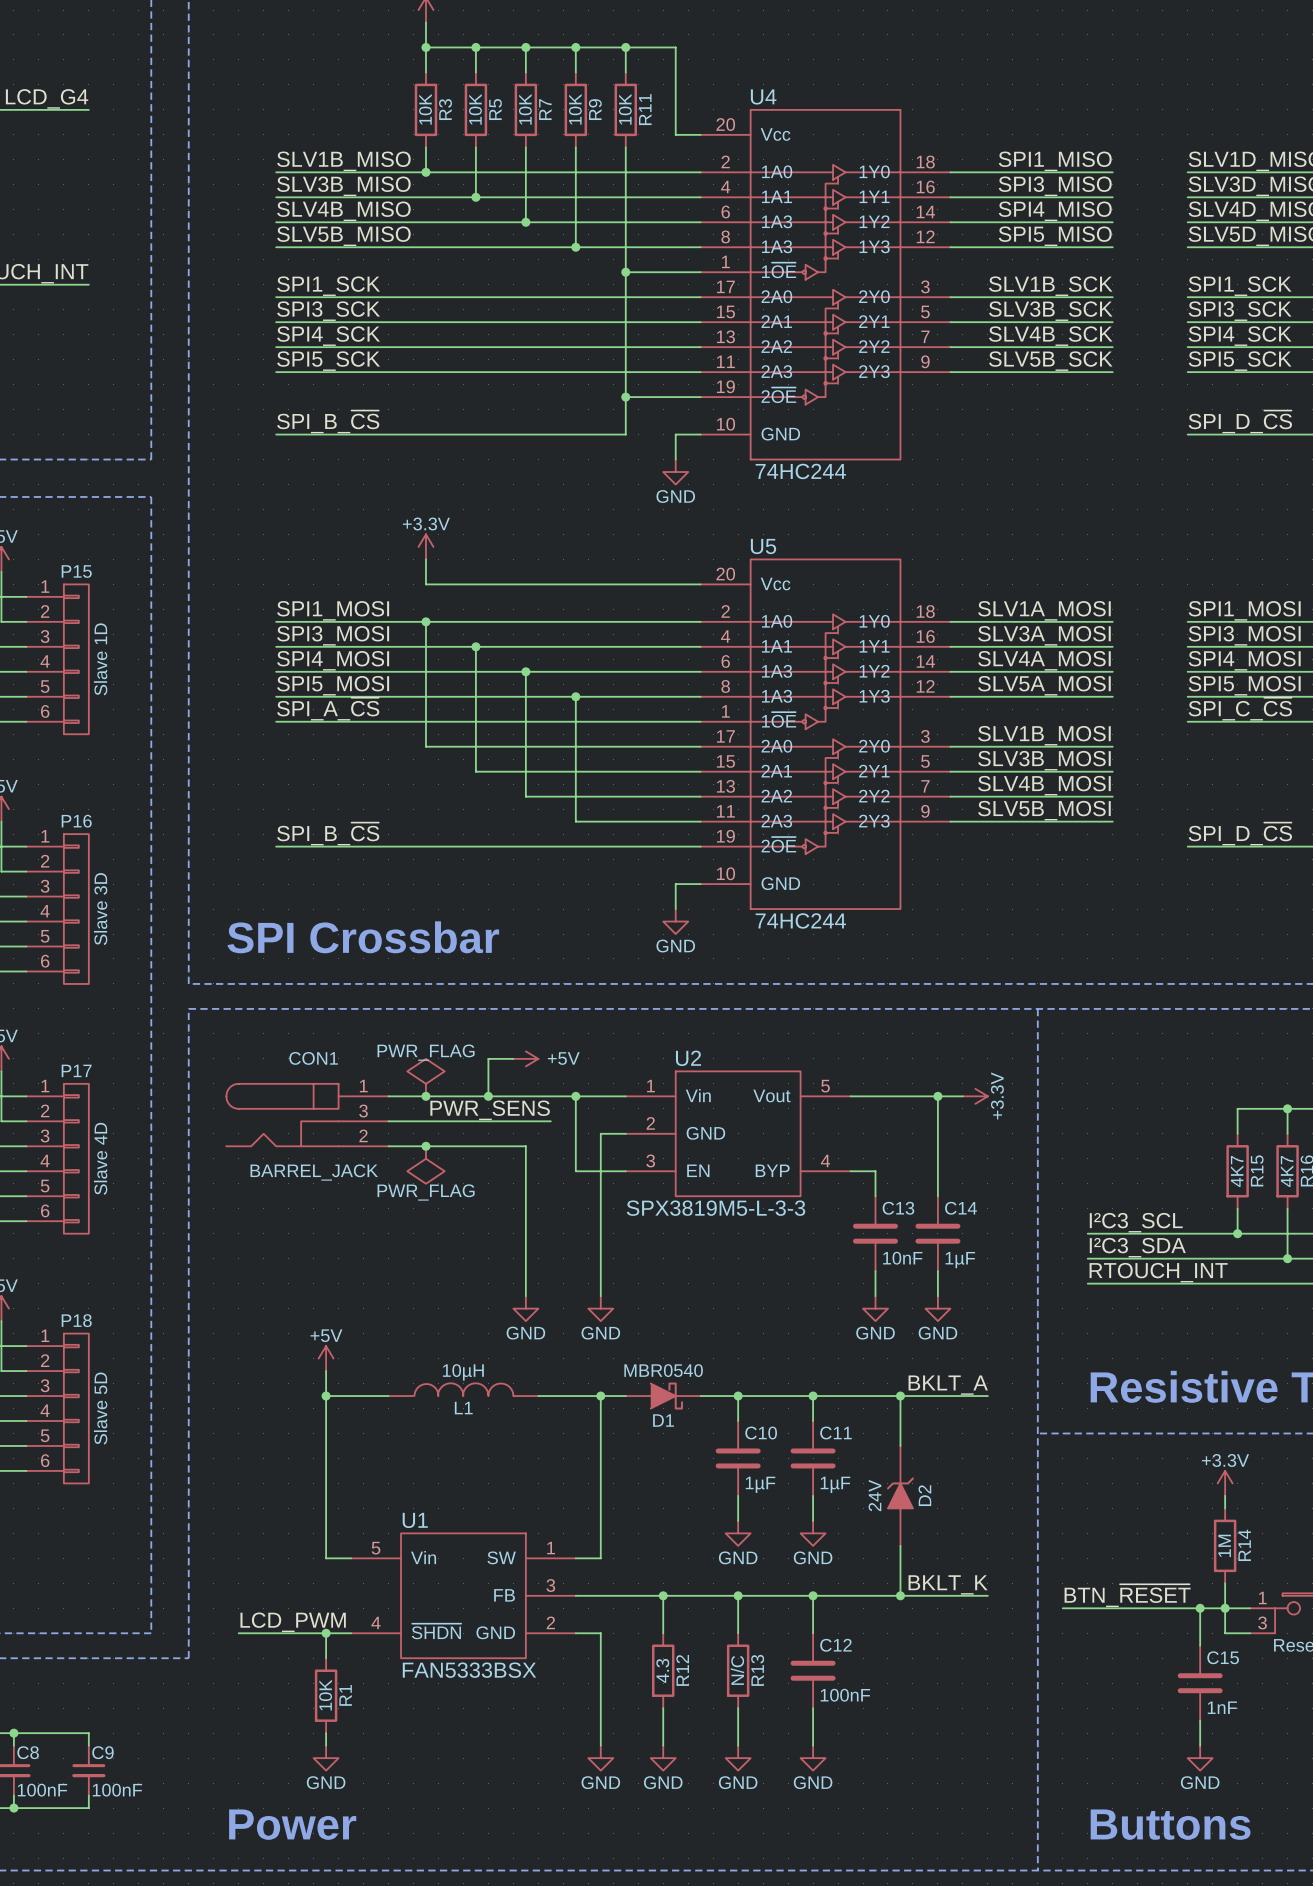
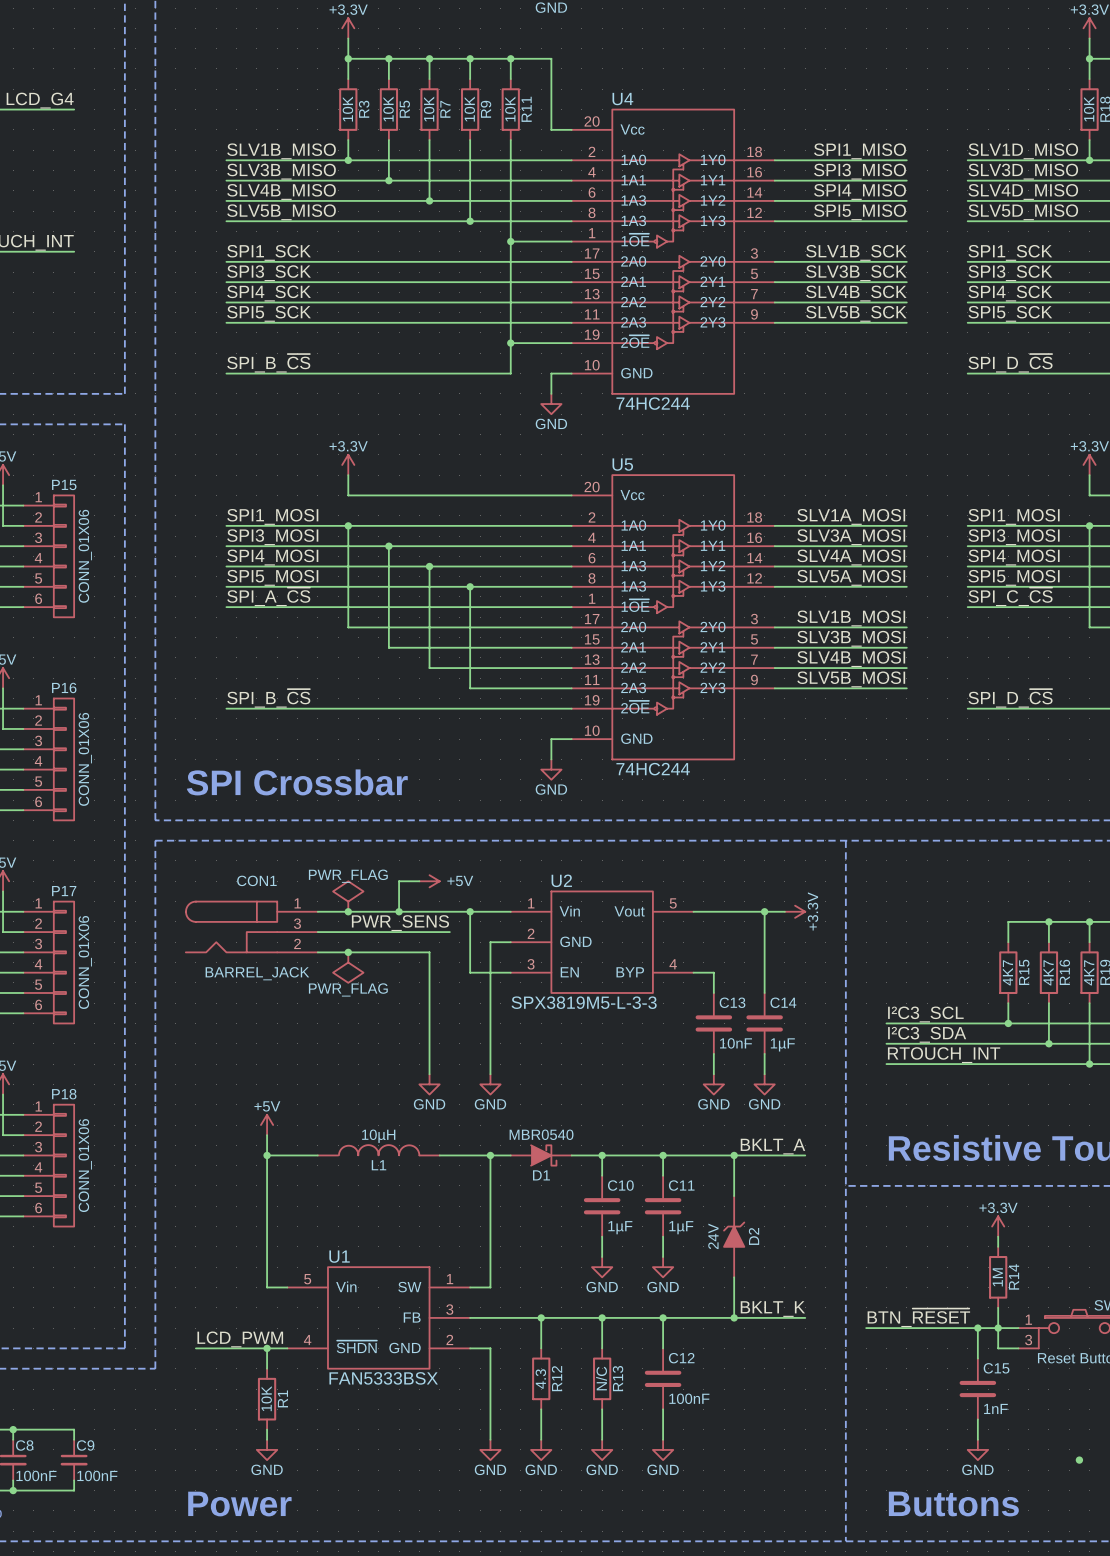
P15 value: Slave 1D (100, 659) -> CONN_01X06 (85, 556)
P16 value: Slave 3D (100, 909) -> CONN_01X06 (85, 759)
P17 value: Slave 4D (100, 1158) -> CONN_01X06 (85, 962)
P18 value: Slave 5D (100, 1408) -> CONN_01X06 (85, 1165)

